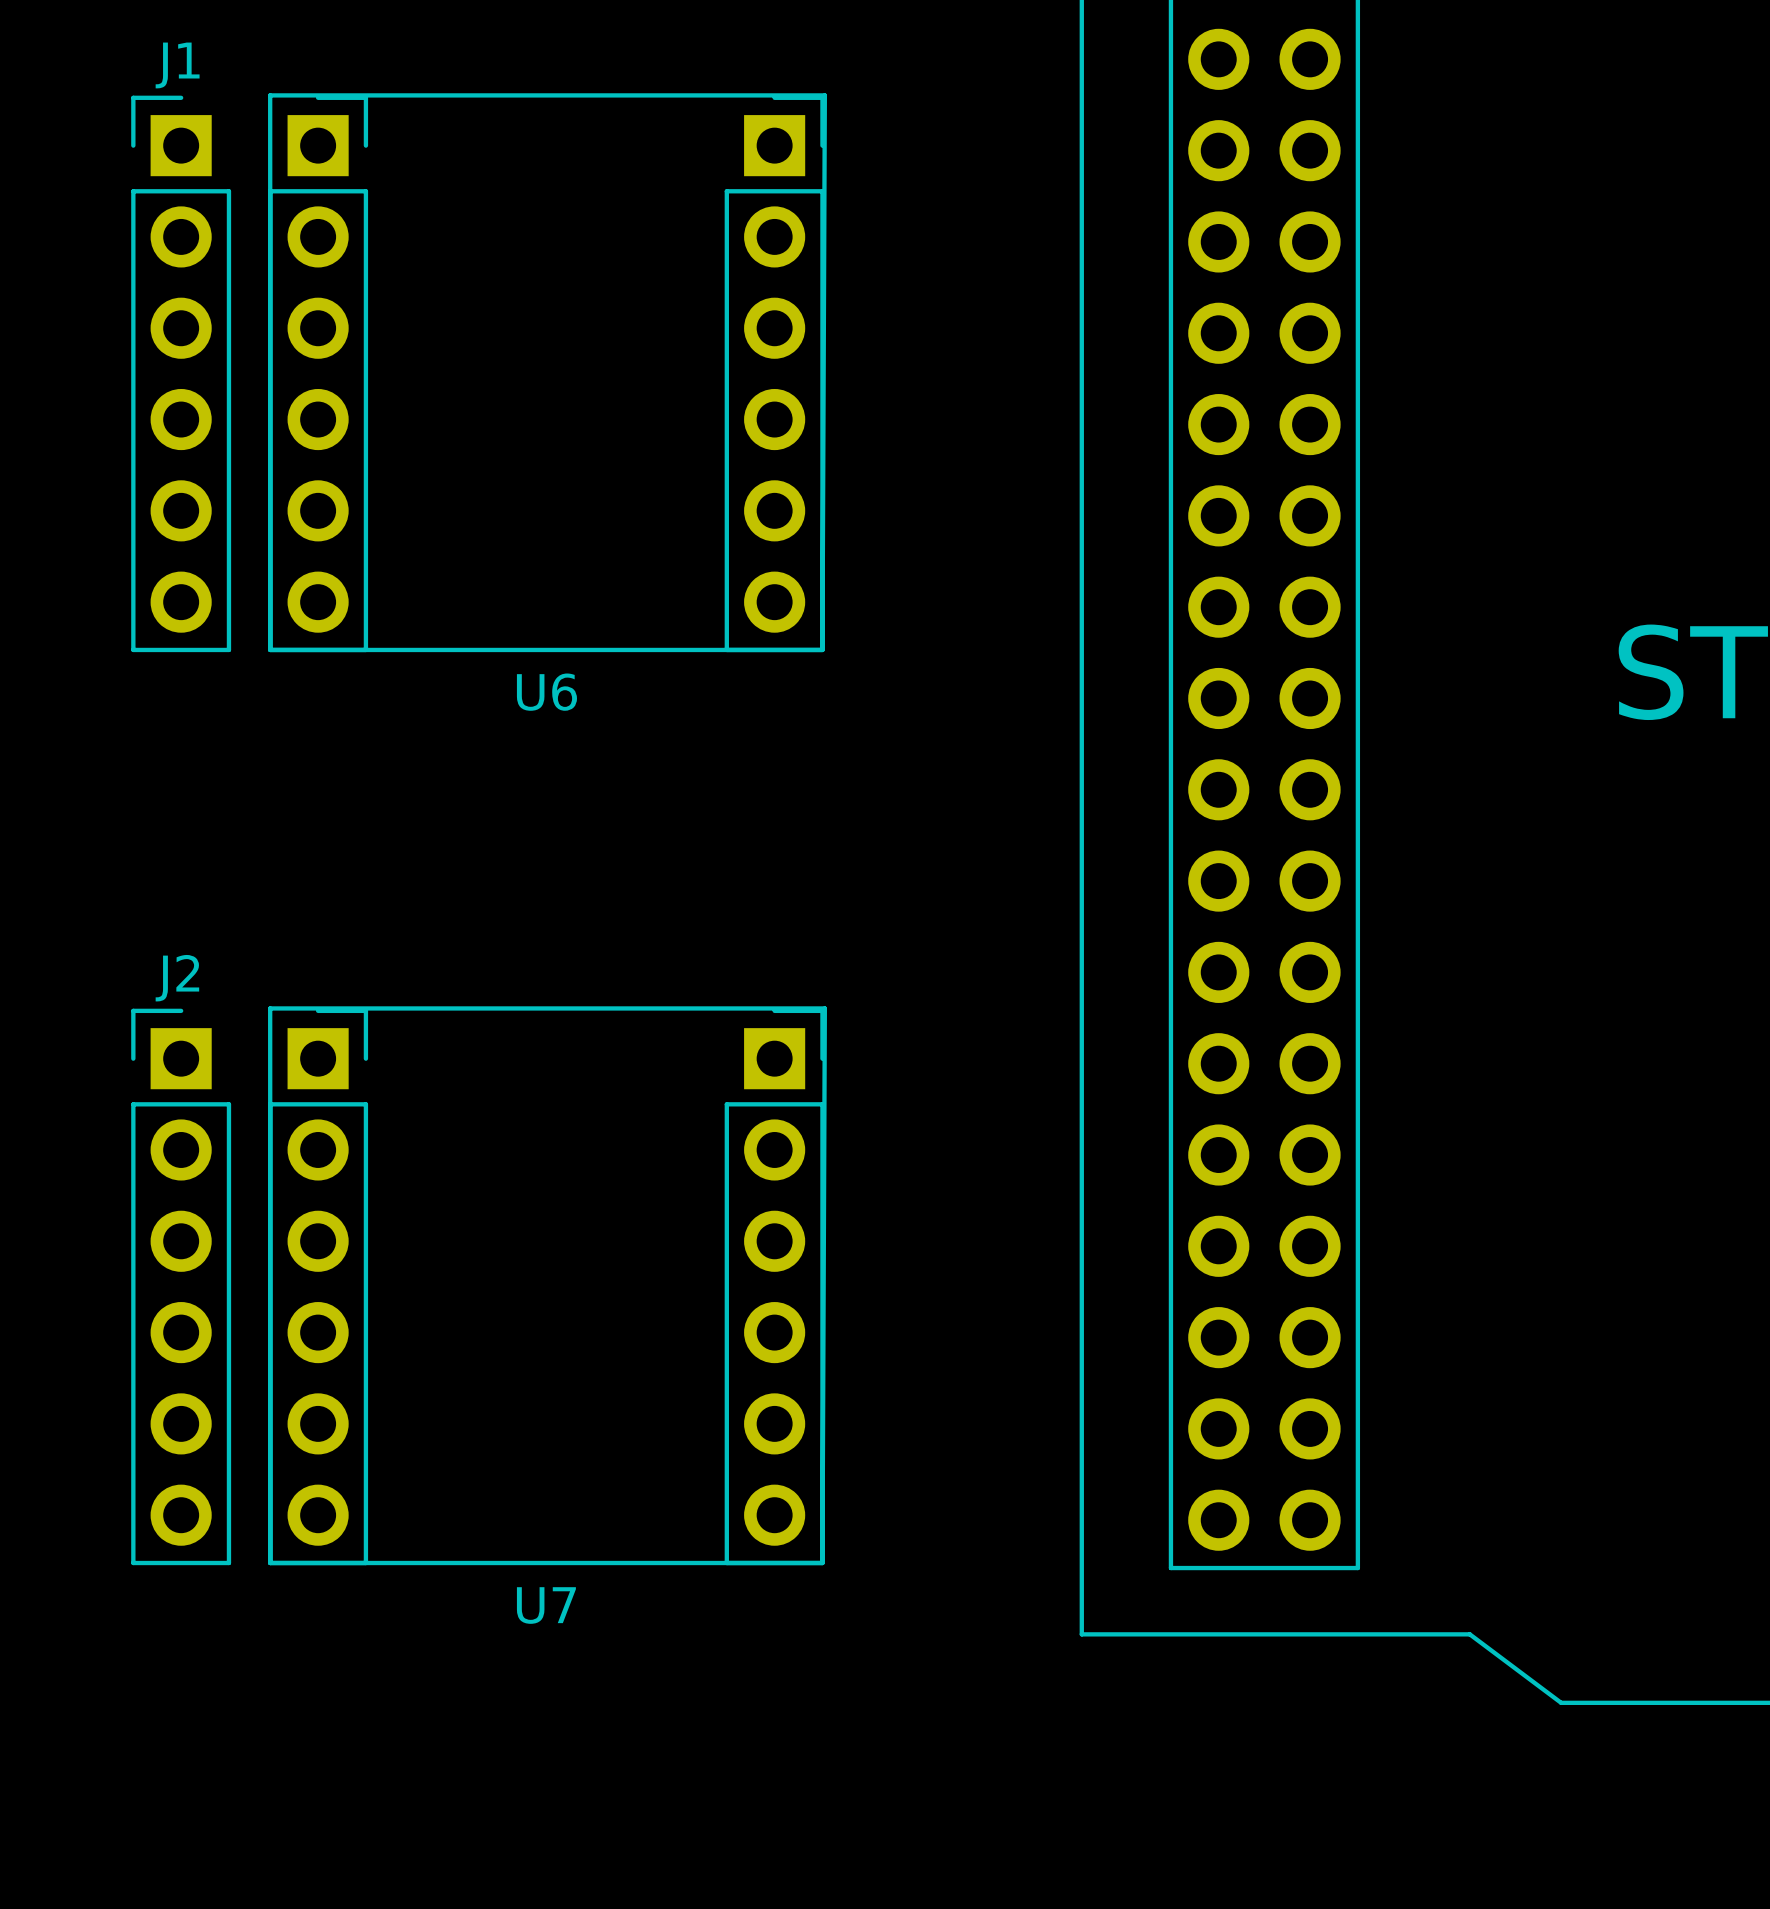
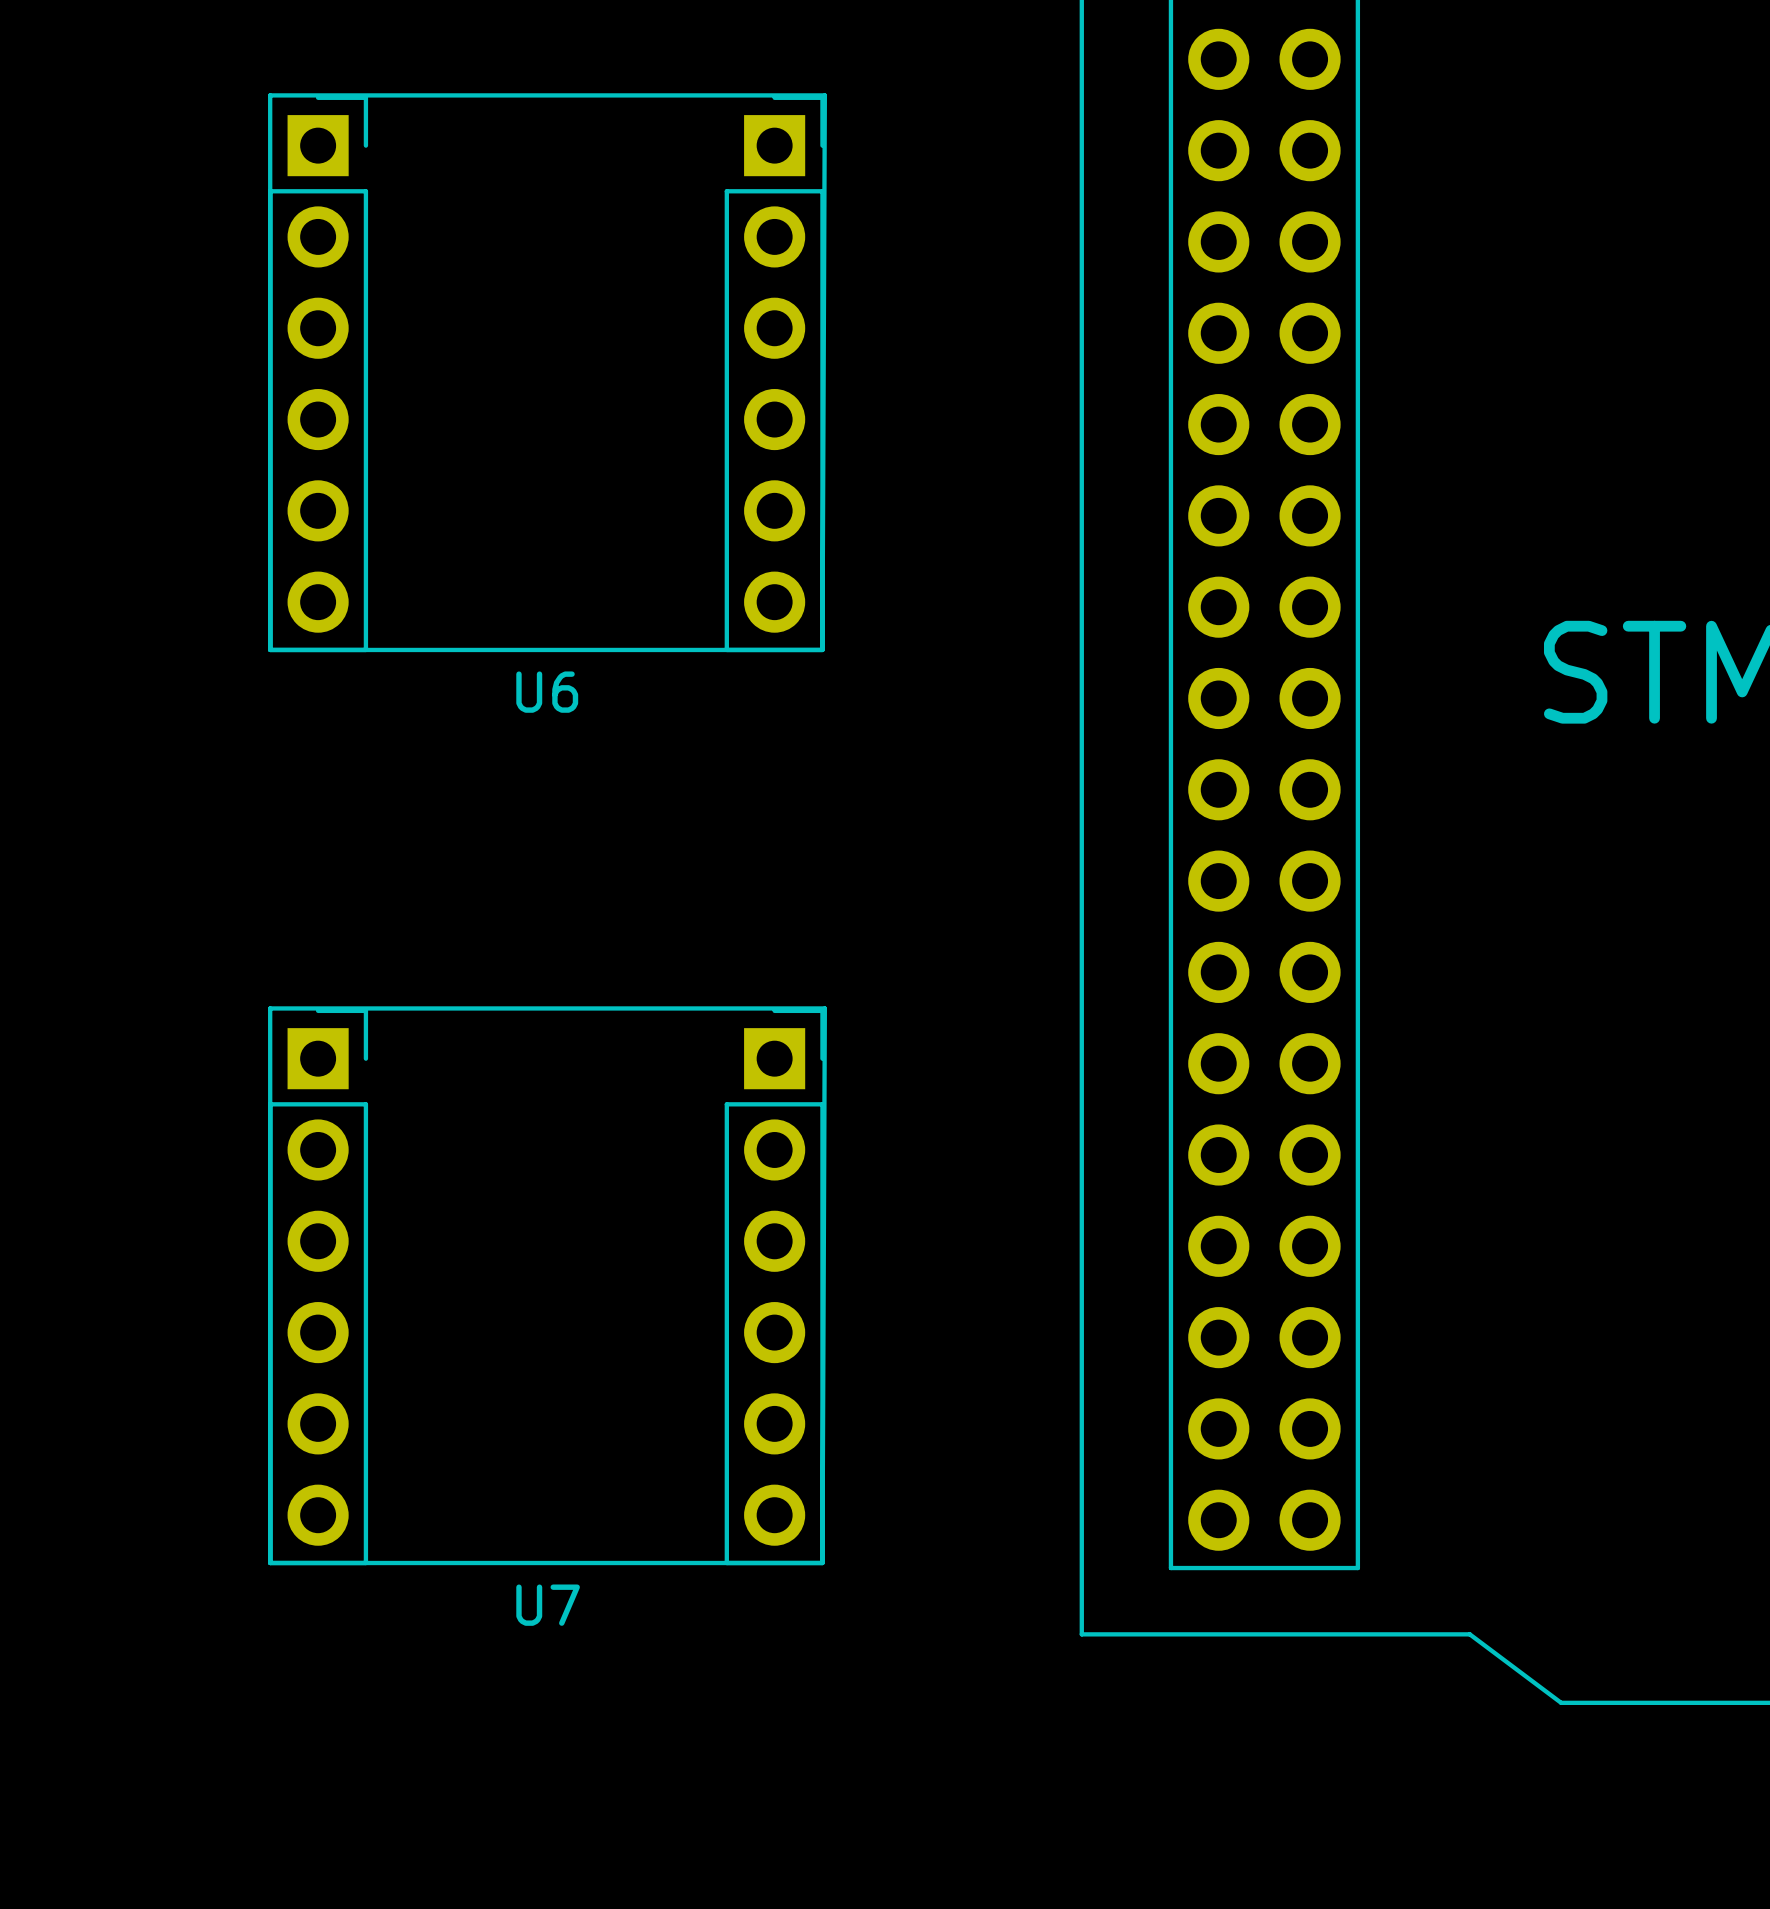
J1: (181, 373) -> none
J2: (181, 1286) -> none

